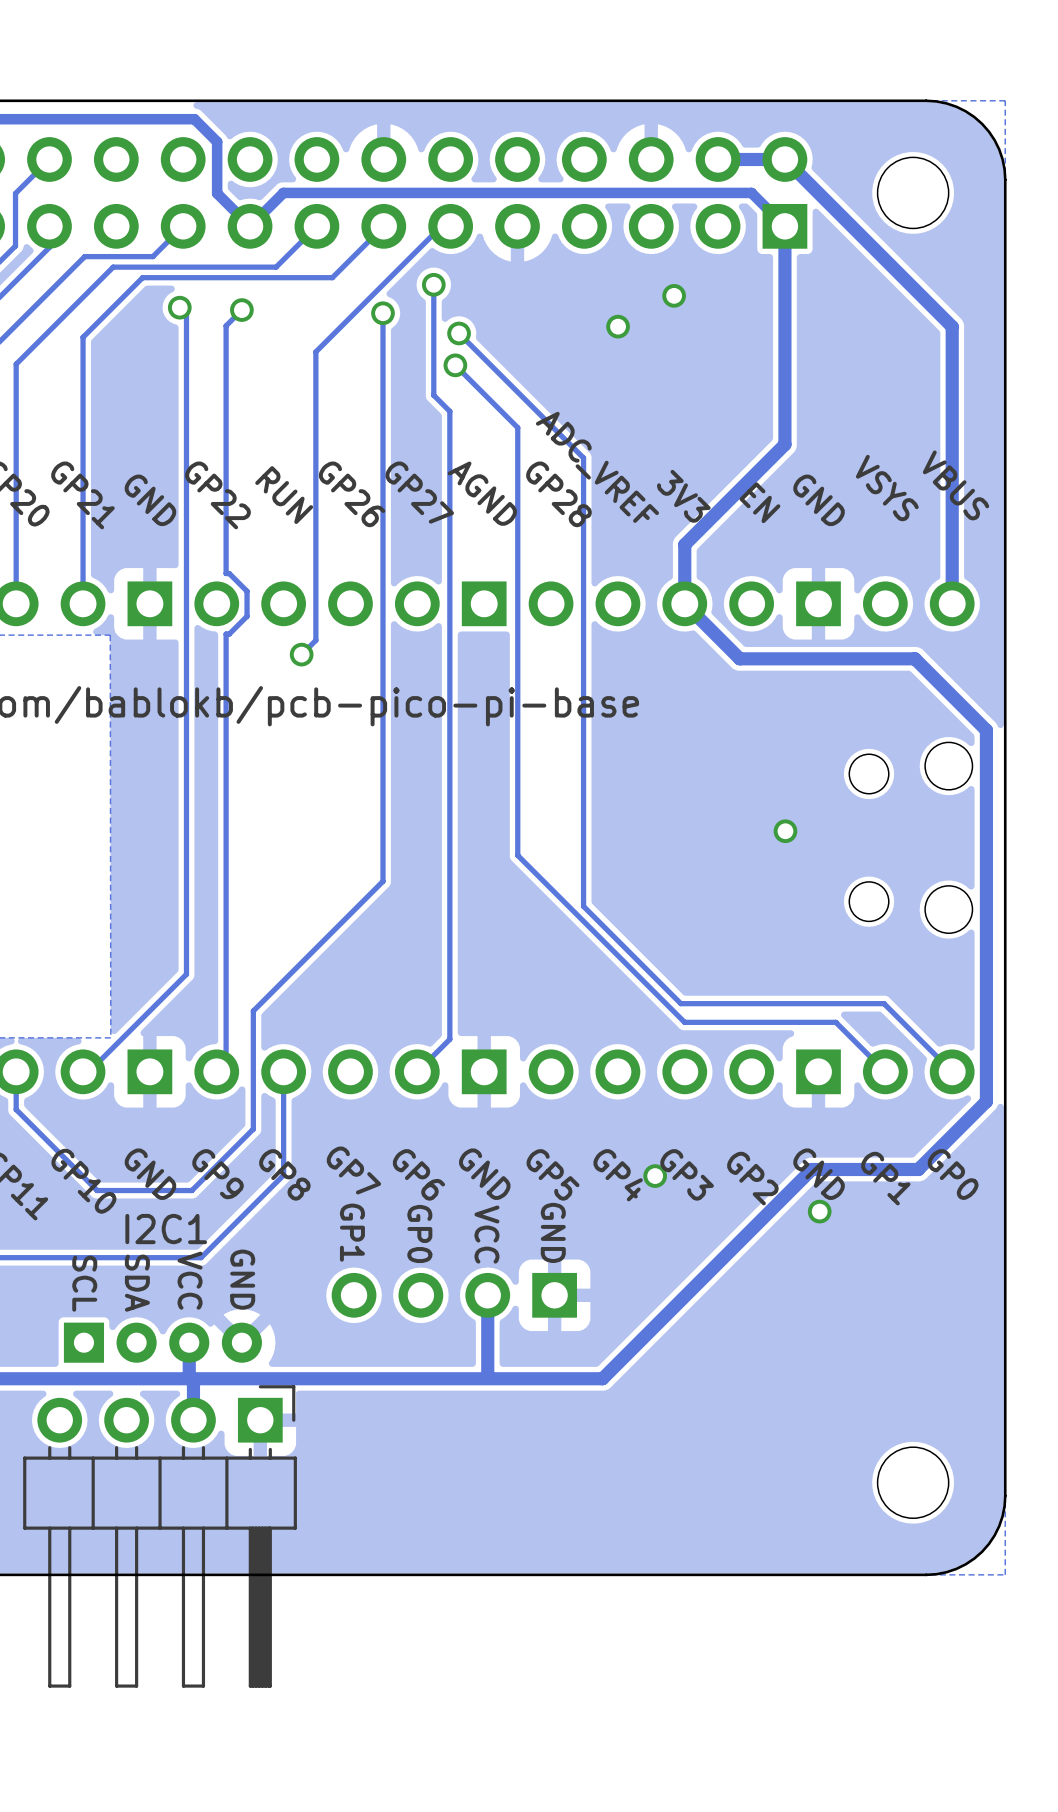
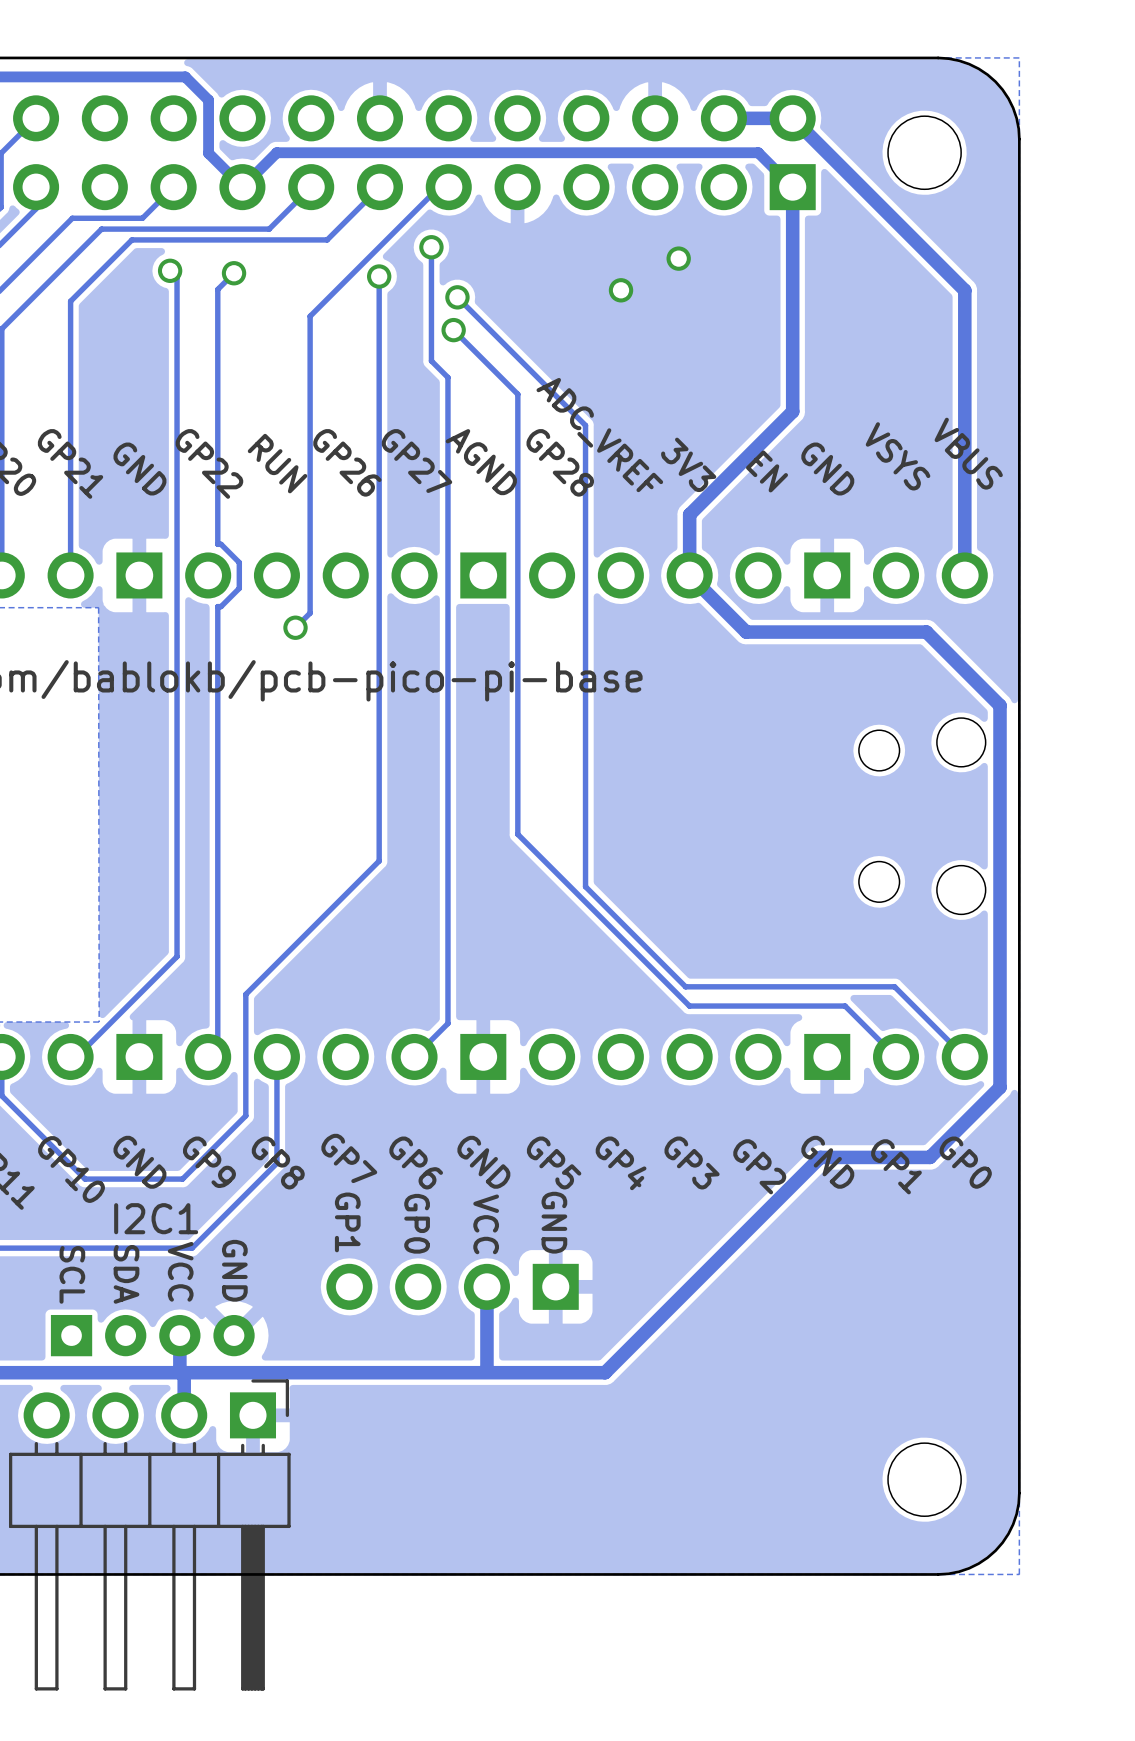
via: (785, 831) -> none
via: (655, 1176) -> none
via: (819, 1211) -> none

